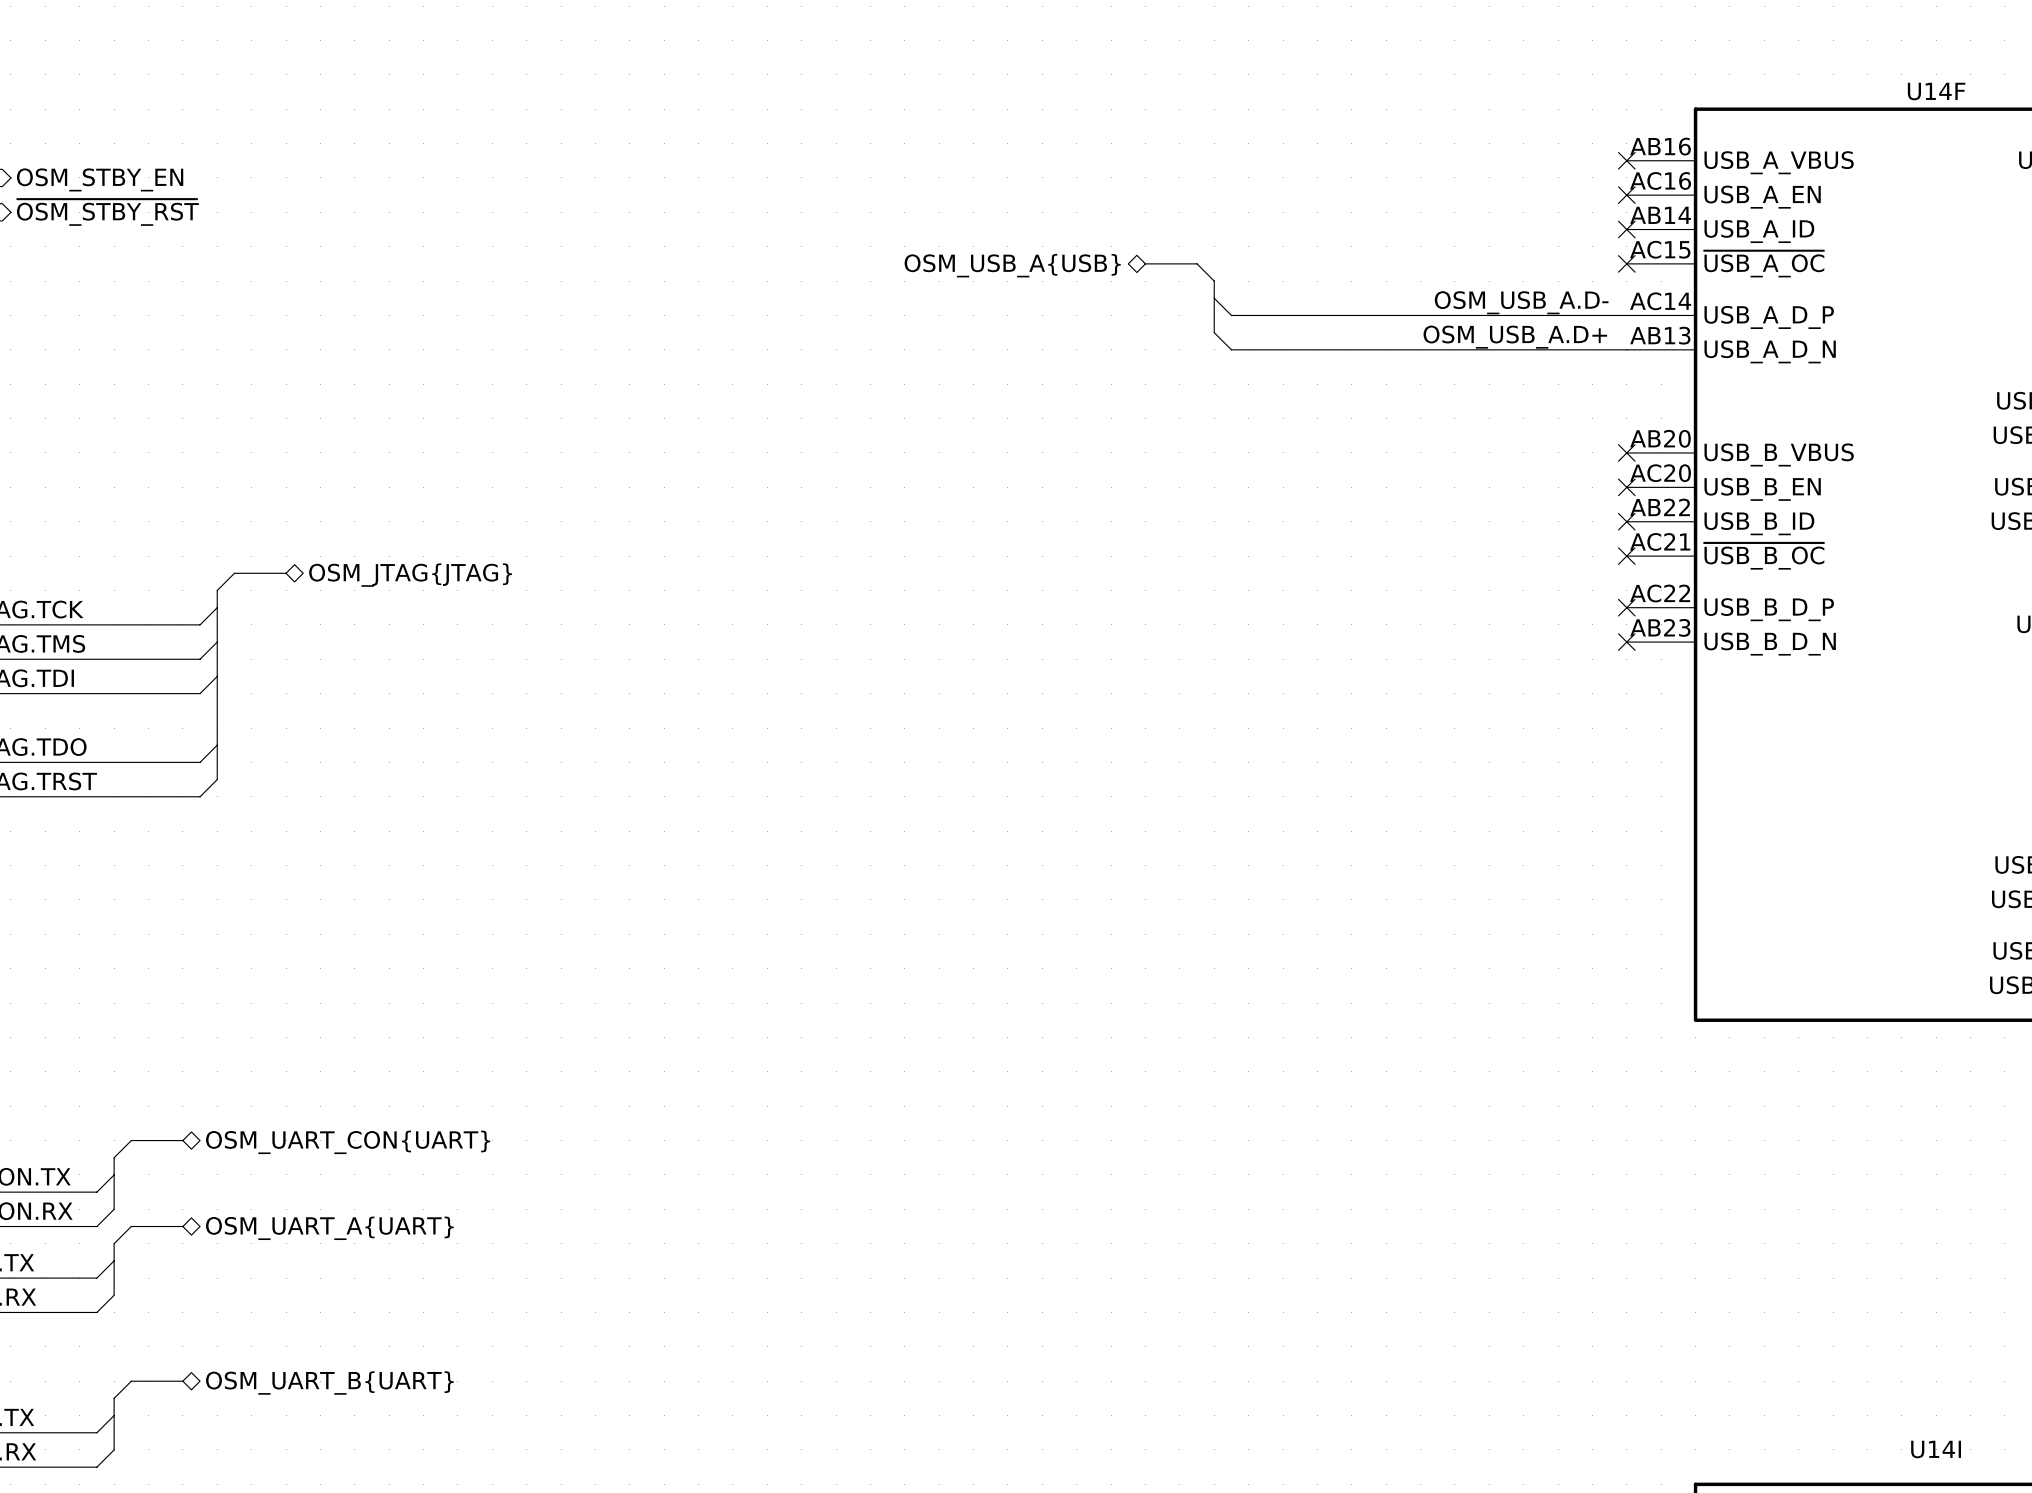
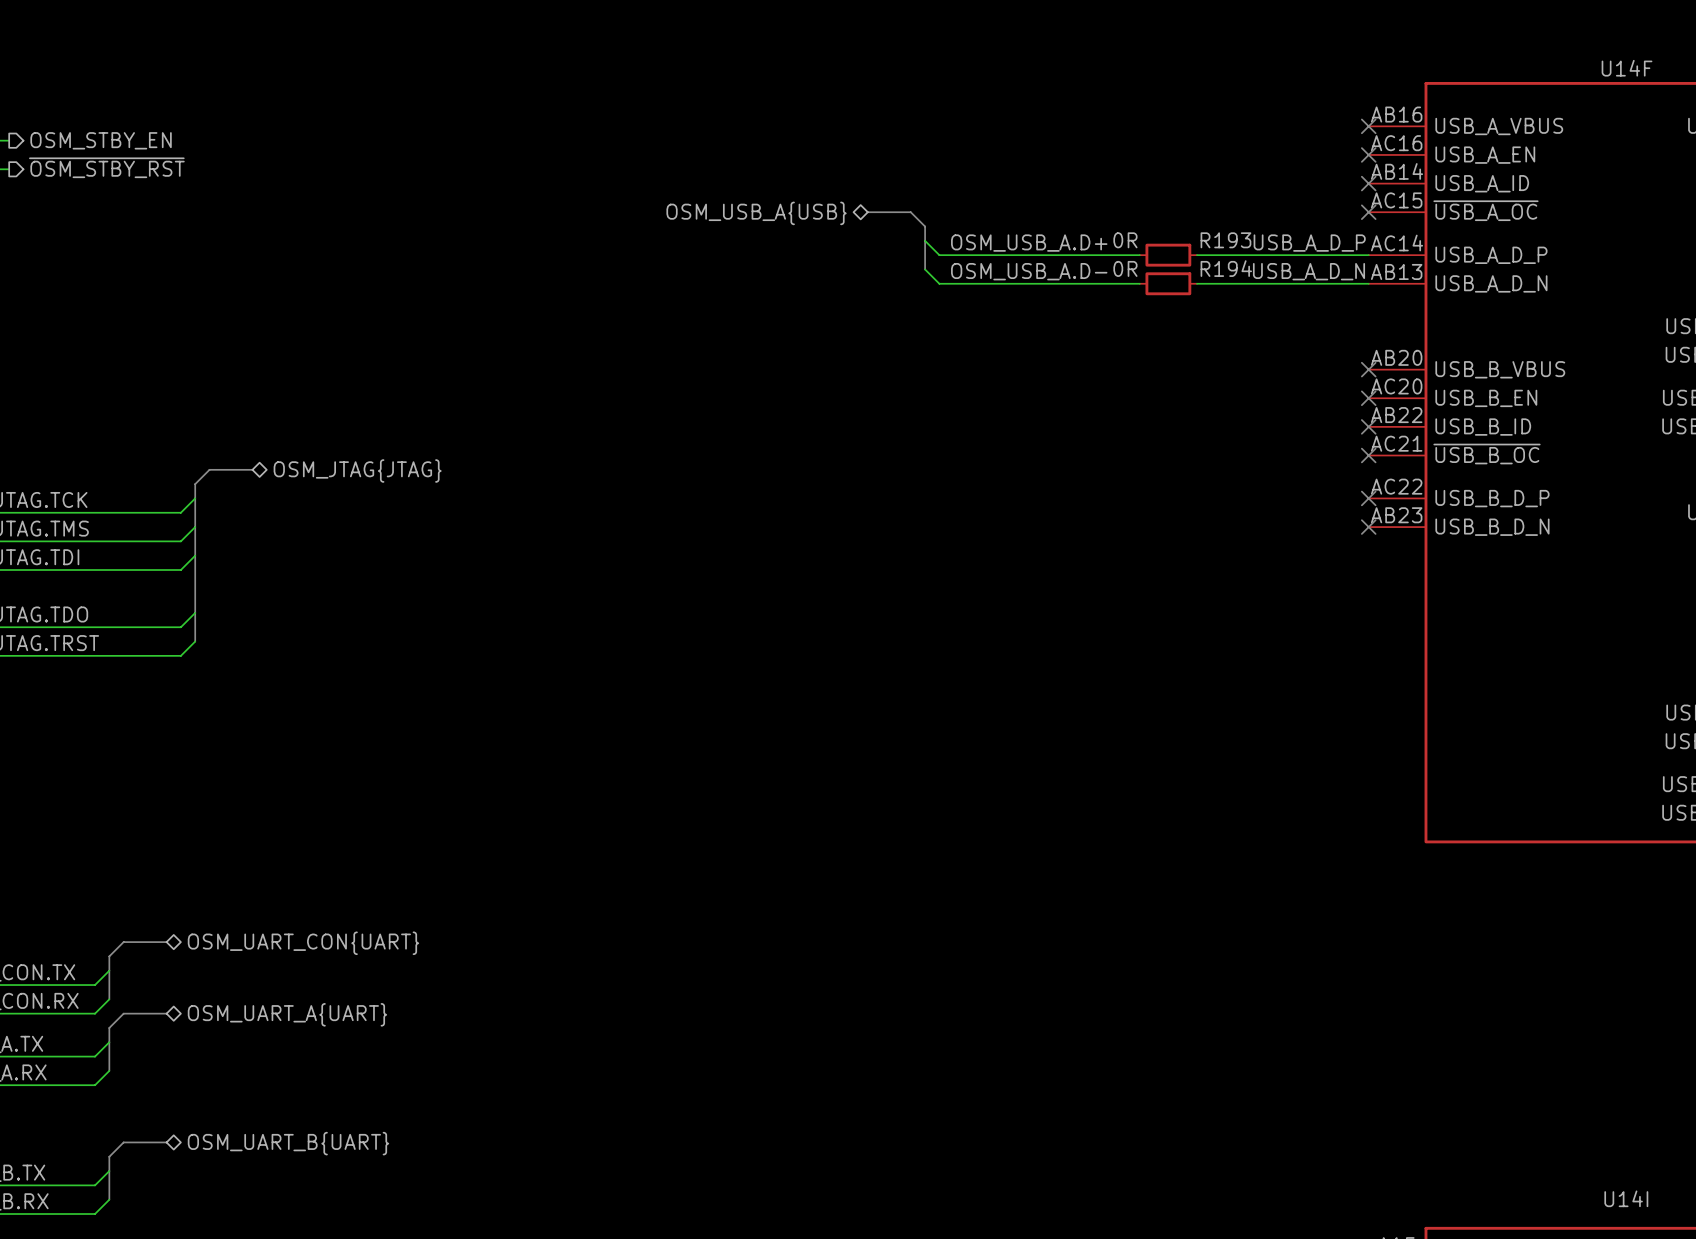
bus: (1145, 263) (1197, 263) (1214, 281) (1214, 332) -> (867, 212) (910, 212) (925, 226) (925, 269)
hierarchical label position: OSM_USB_A{USB} (1012, 265) -> OSM_USB_A{USB} (756, 213)
wire: (1214, 298) (1231, 315) -> (925, 240) (939, 255) (1039, 255)
label position: OSM_USB_A.D- (1521, 302) -> OSM_USB_A.D- (1029, 271)
label: none -> USB_A_D_P (1309, 243)
wire: (1351, 315) (1420, 315) -> none
R193: none -> (1168, 255)
wire: (1214, 332) (1231, 349) -> (925, 269) (939, 283) (1039, 283)
label position: OSM_USB_A.D+ (1515, 337) -> OSM_USB_A.D+ (1029, 243)
label: none -> USB_A_D_N (1308, 271)
wire: (1351, 349) (1420, 349) -> none
R194: none -> (1168, 283)

